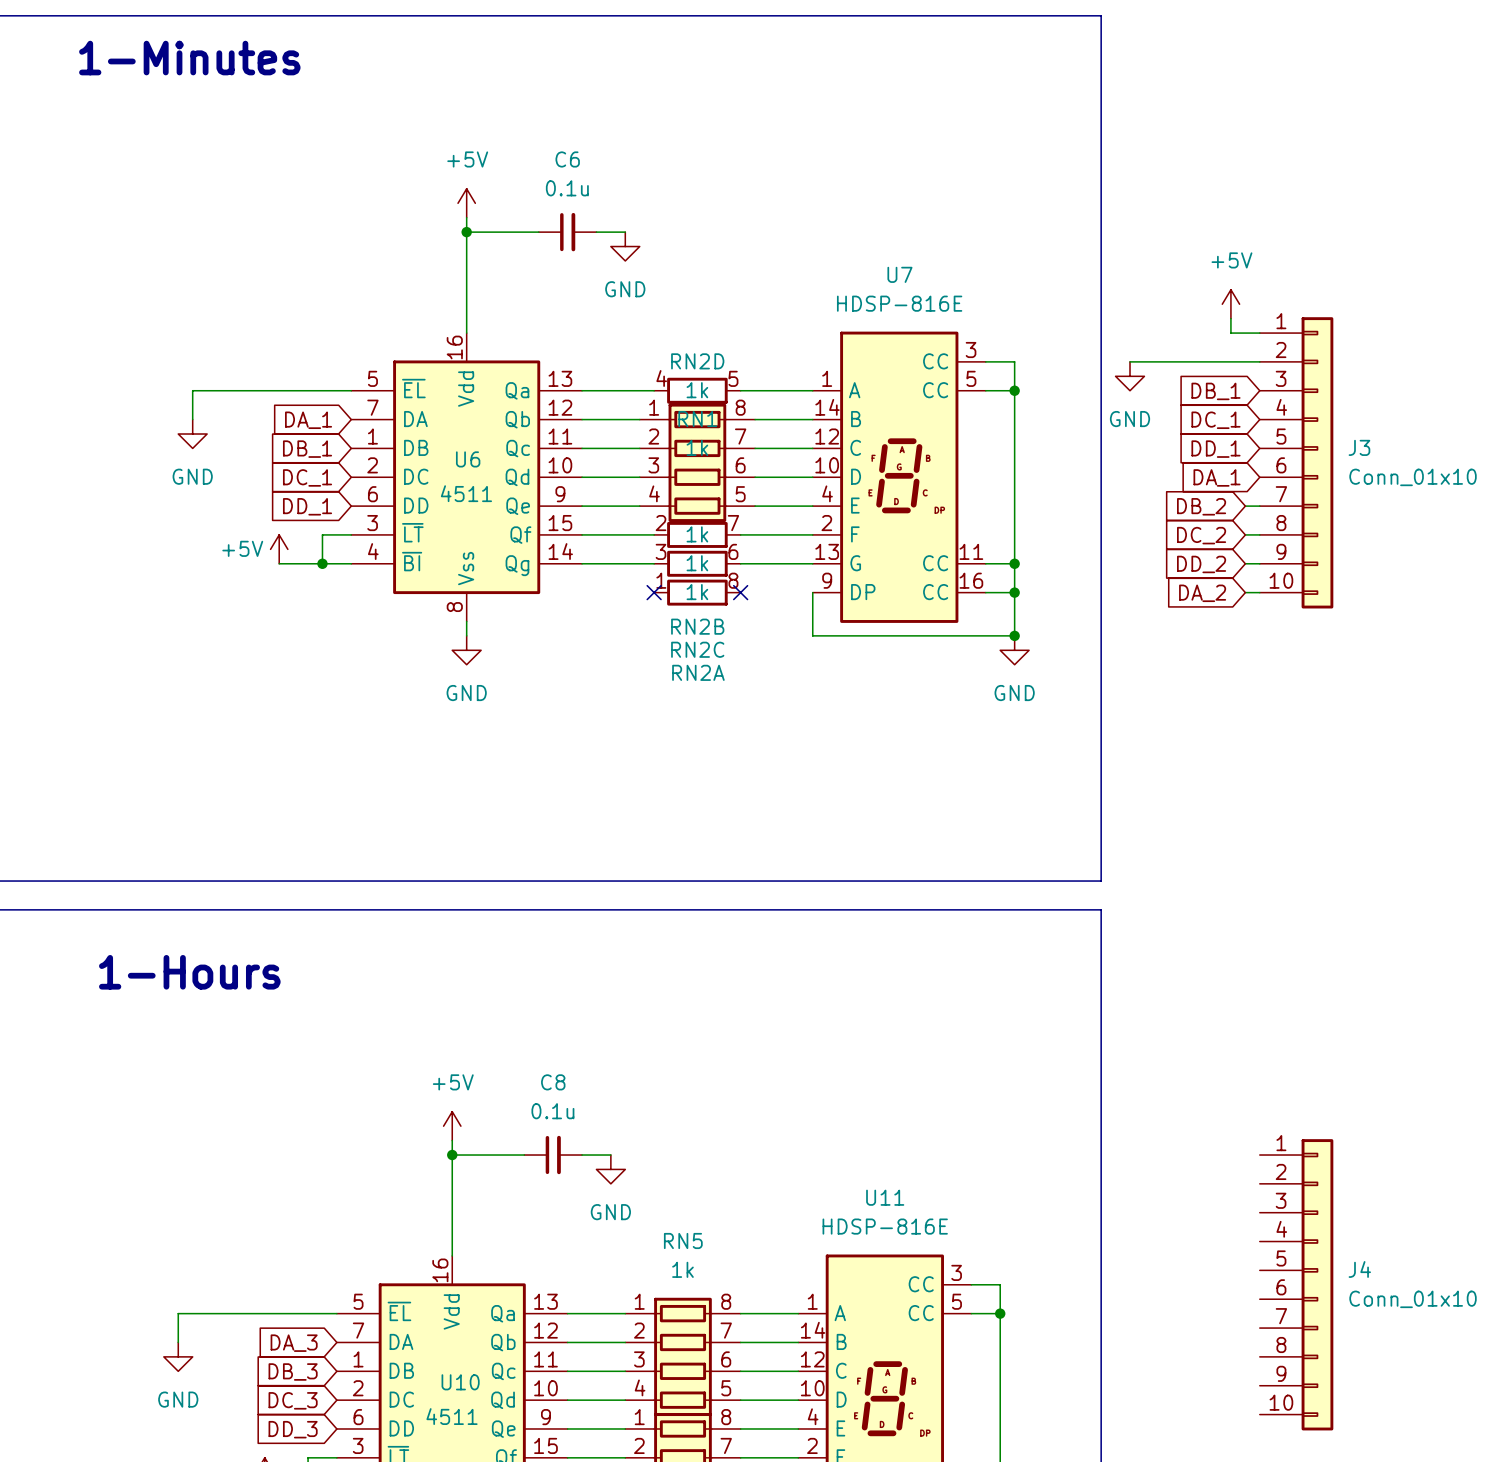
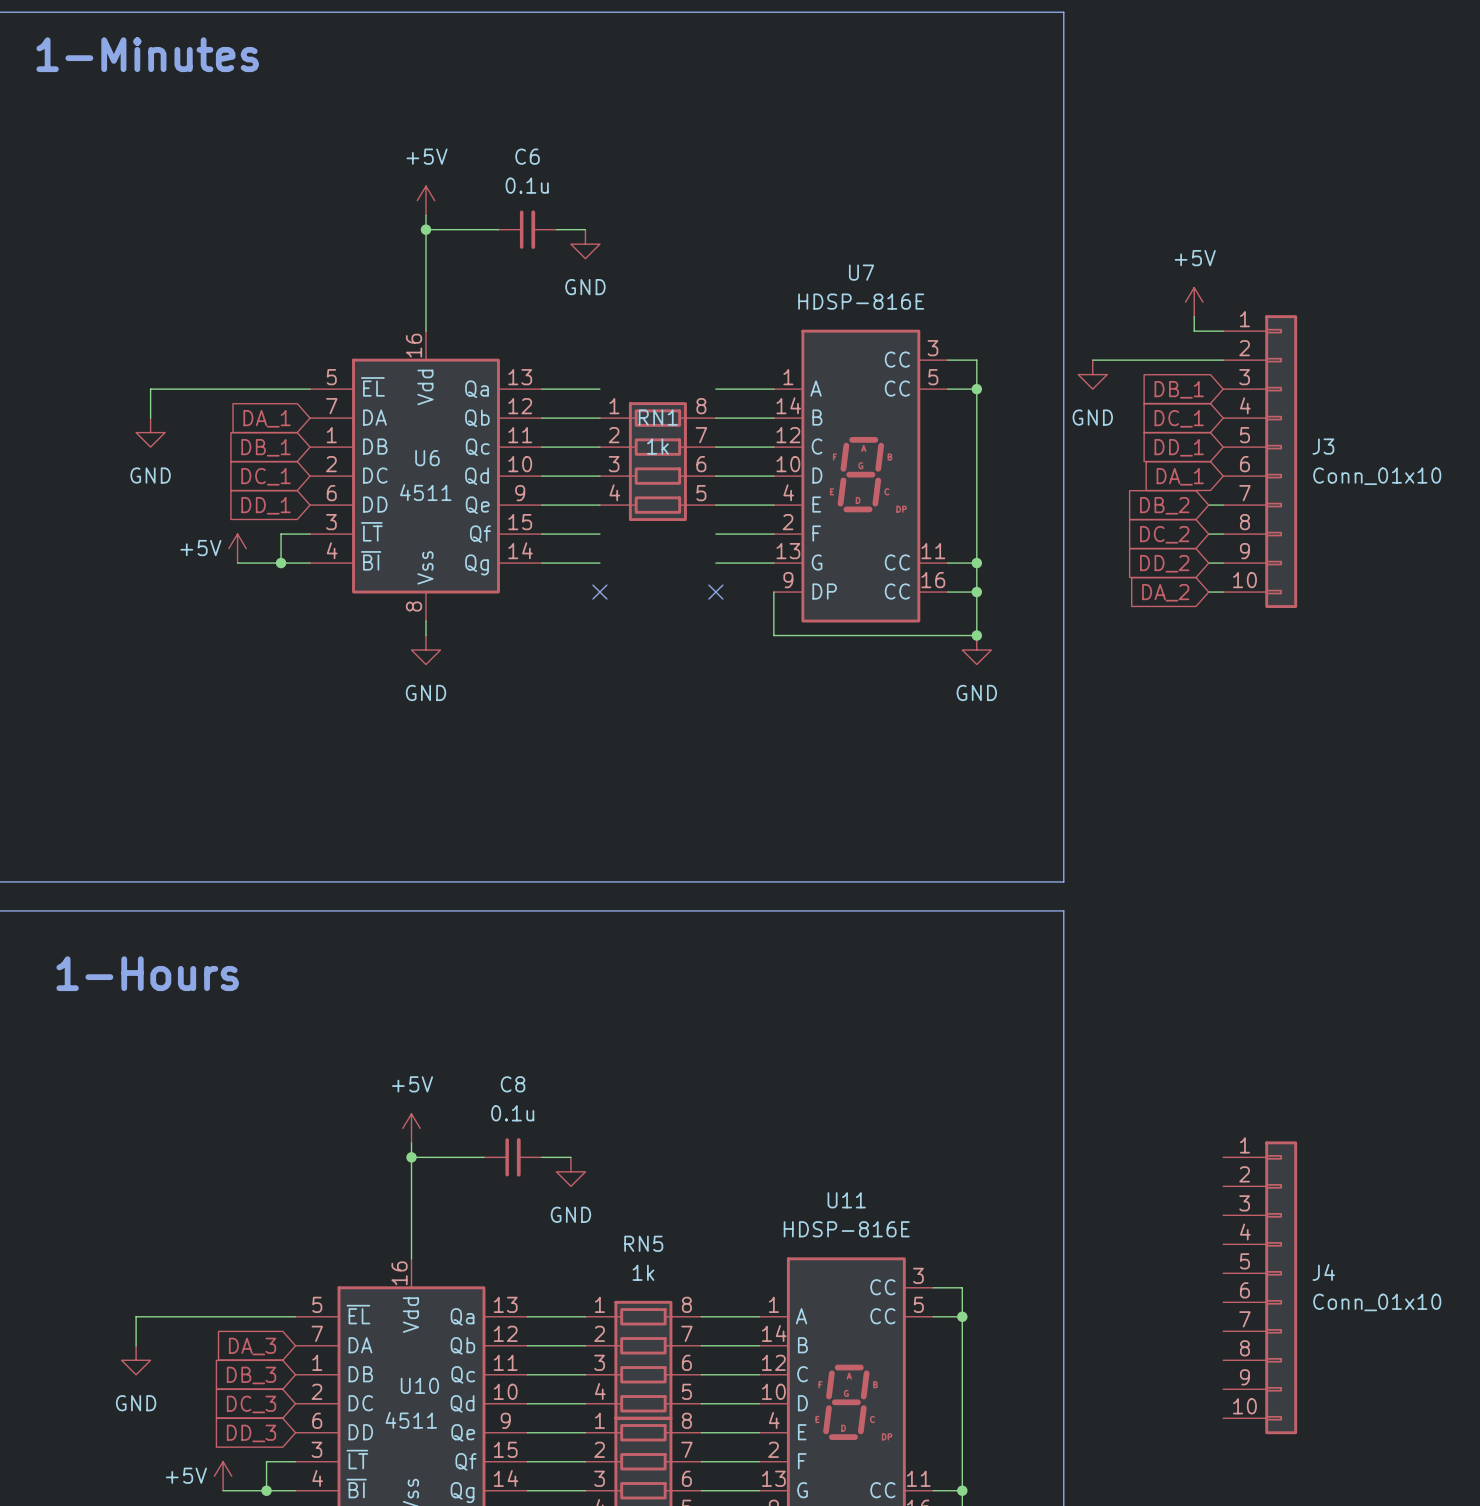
wire: (639, 390) (654, 390) -> none
RN2D: 1k (697, 390) -> none
wire: (740, 390) (755, 390) -> none
wire: (639, 534) (654, 534) -> none
RN2B: 1k (697, 534) -> none
wire: (740, 534) (755, 534) -> none
wire: (639, 563) (654, 563) -> none
RN2C: 1k (697, 563) -> none
wire: (740, 563) (755, 563) -> none
no-connect mark position: (654, 592) -> (599, 592)
RN2A: 1k (697, 592) -> none
no-connect mark position: (740, 592) -> (715, 592)

